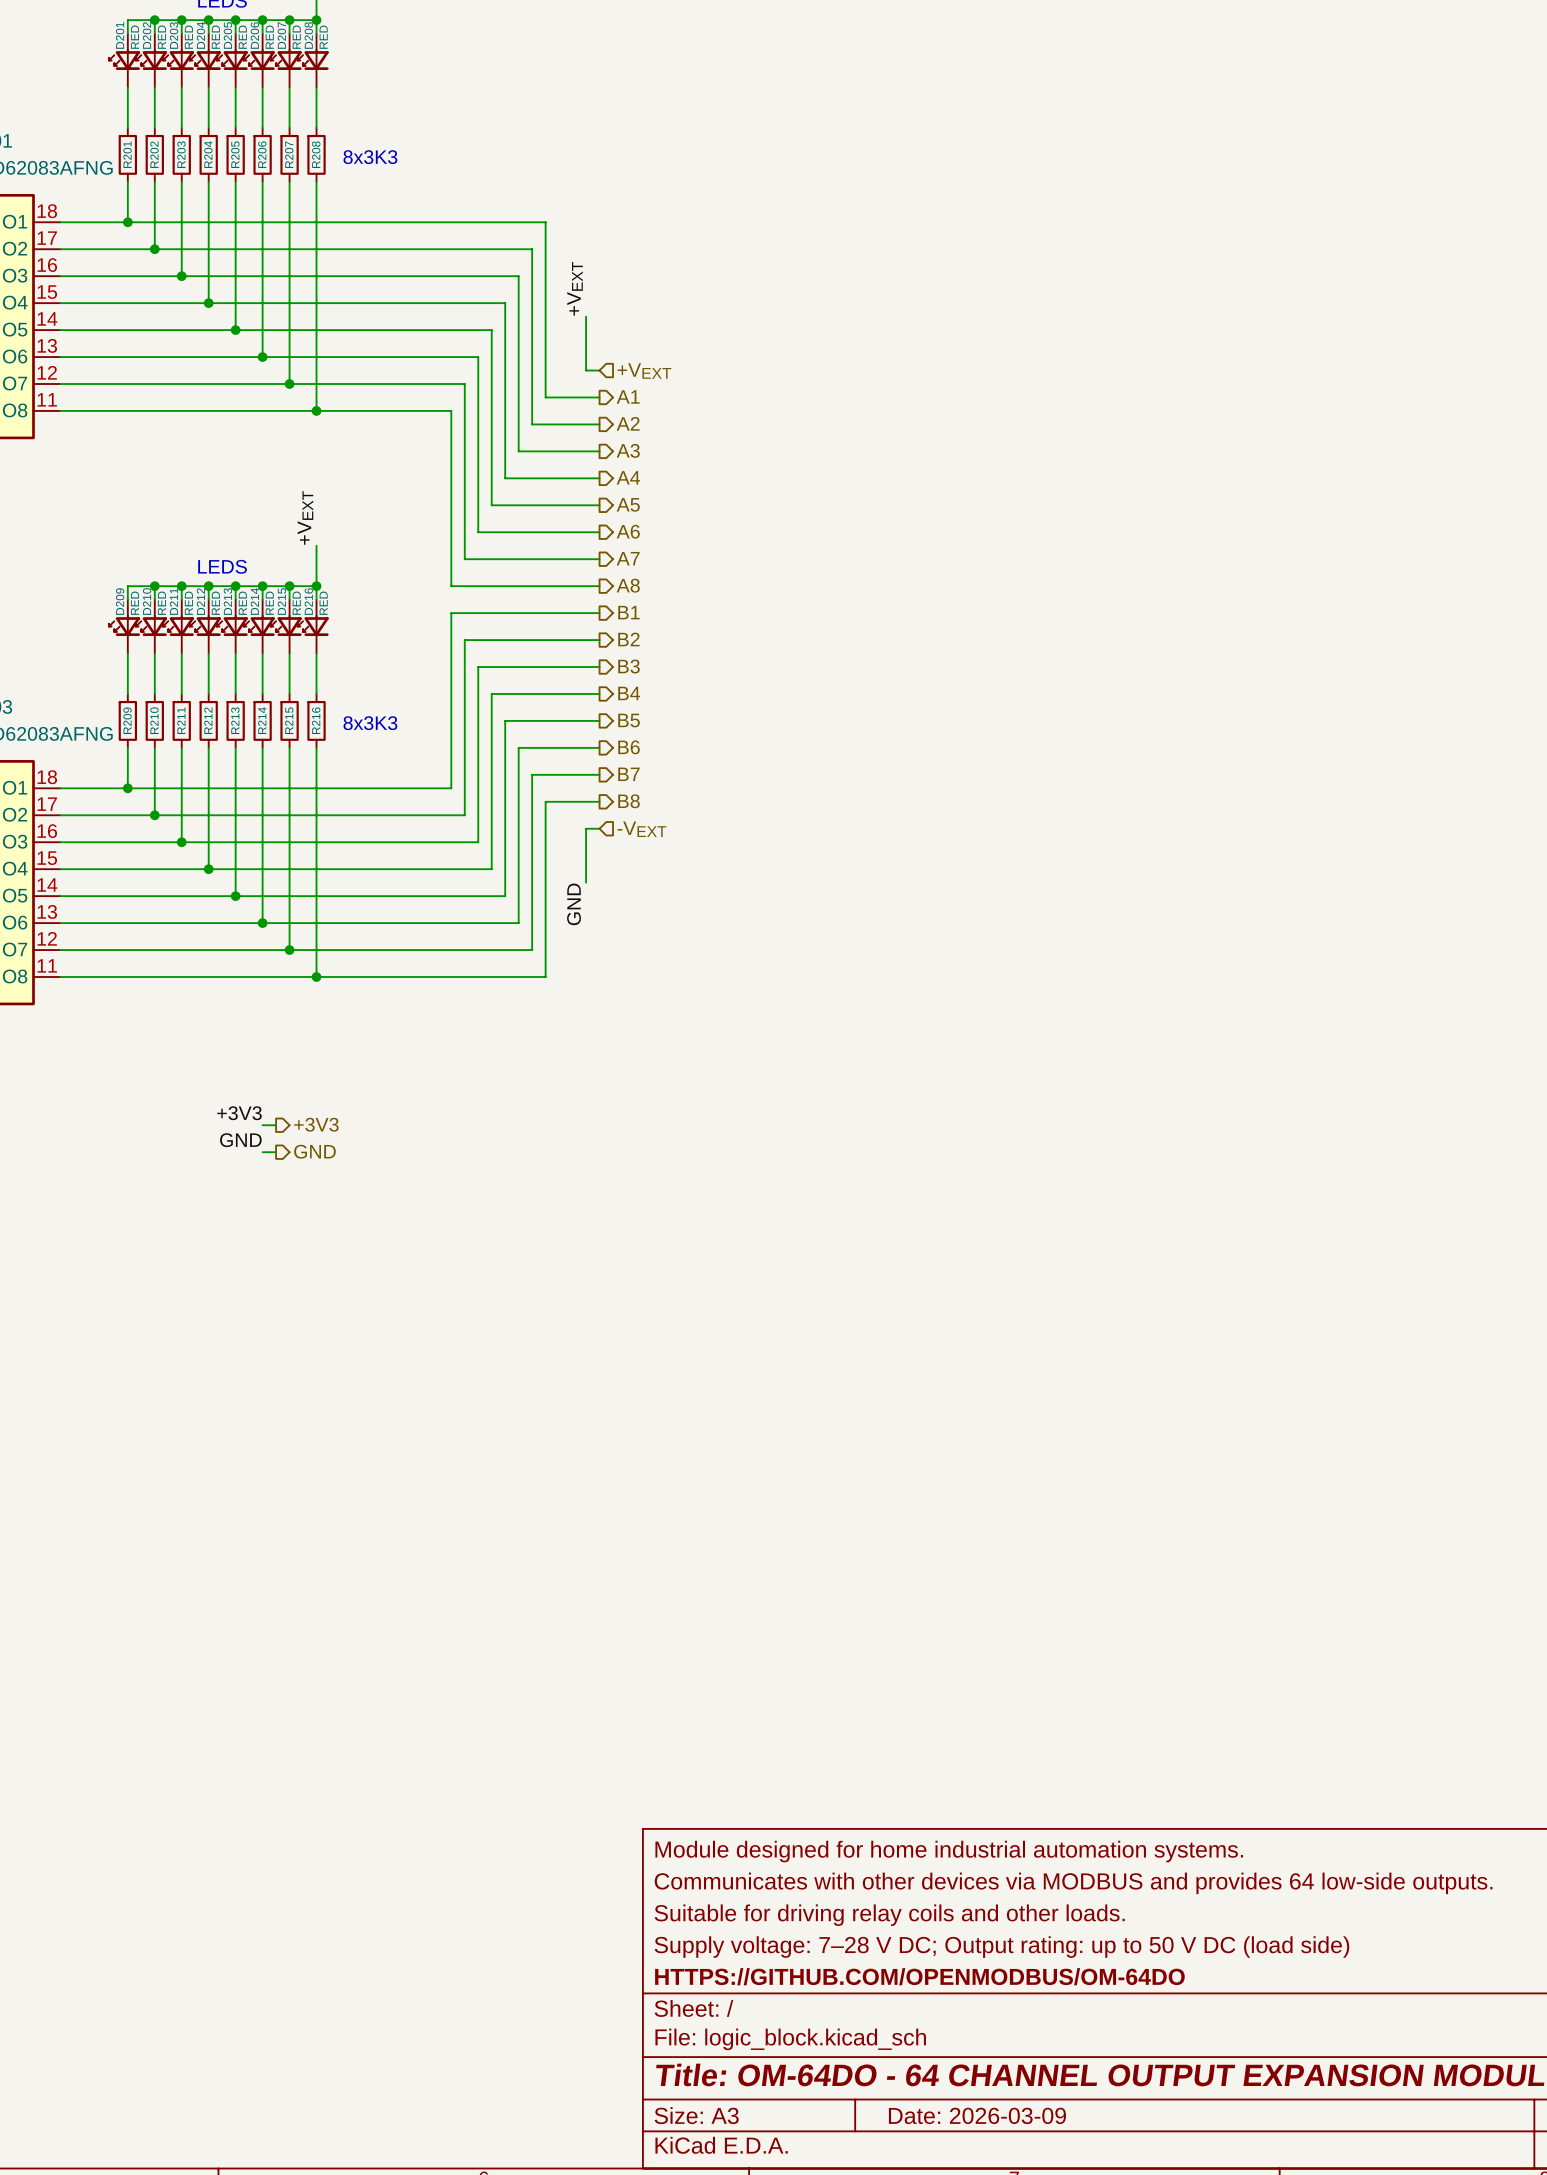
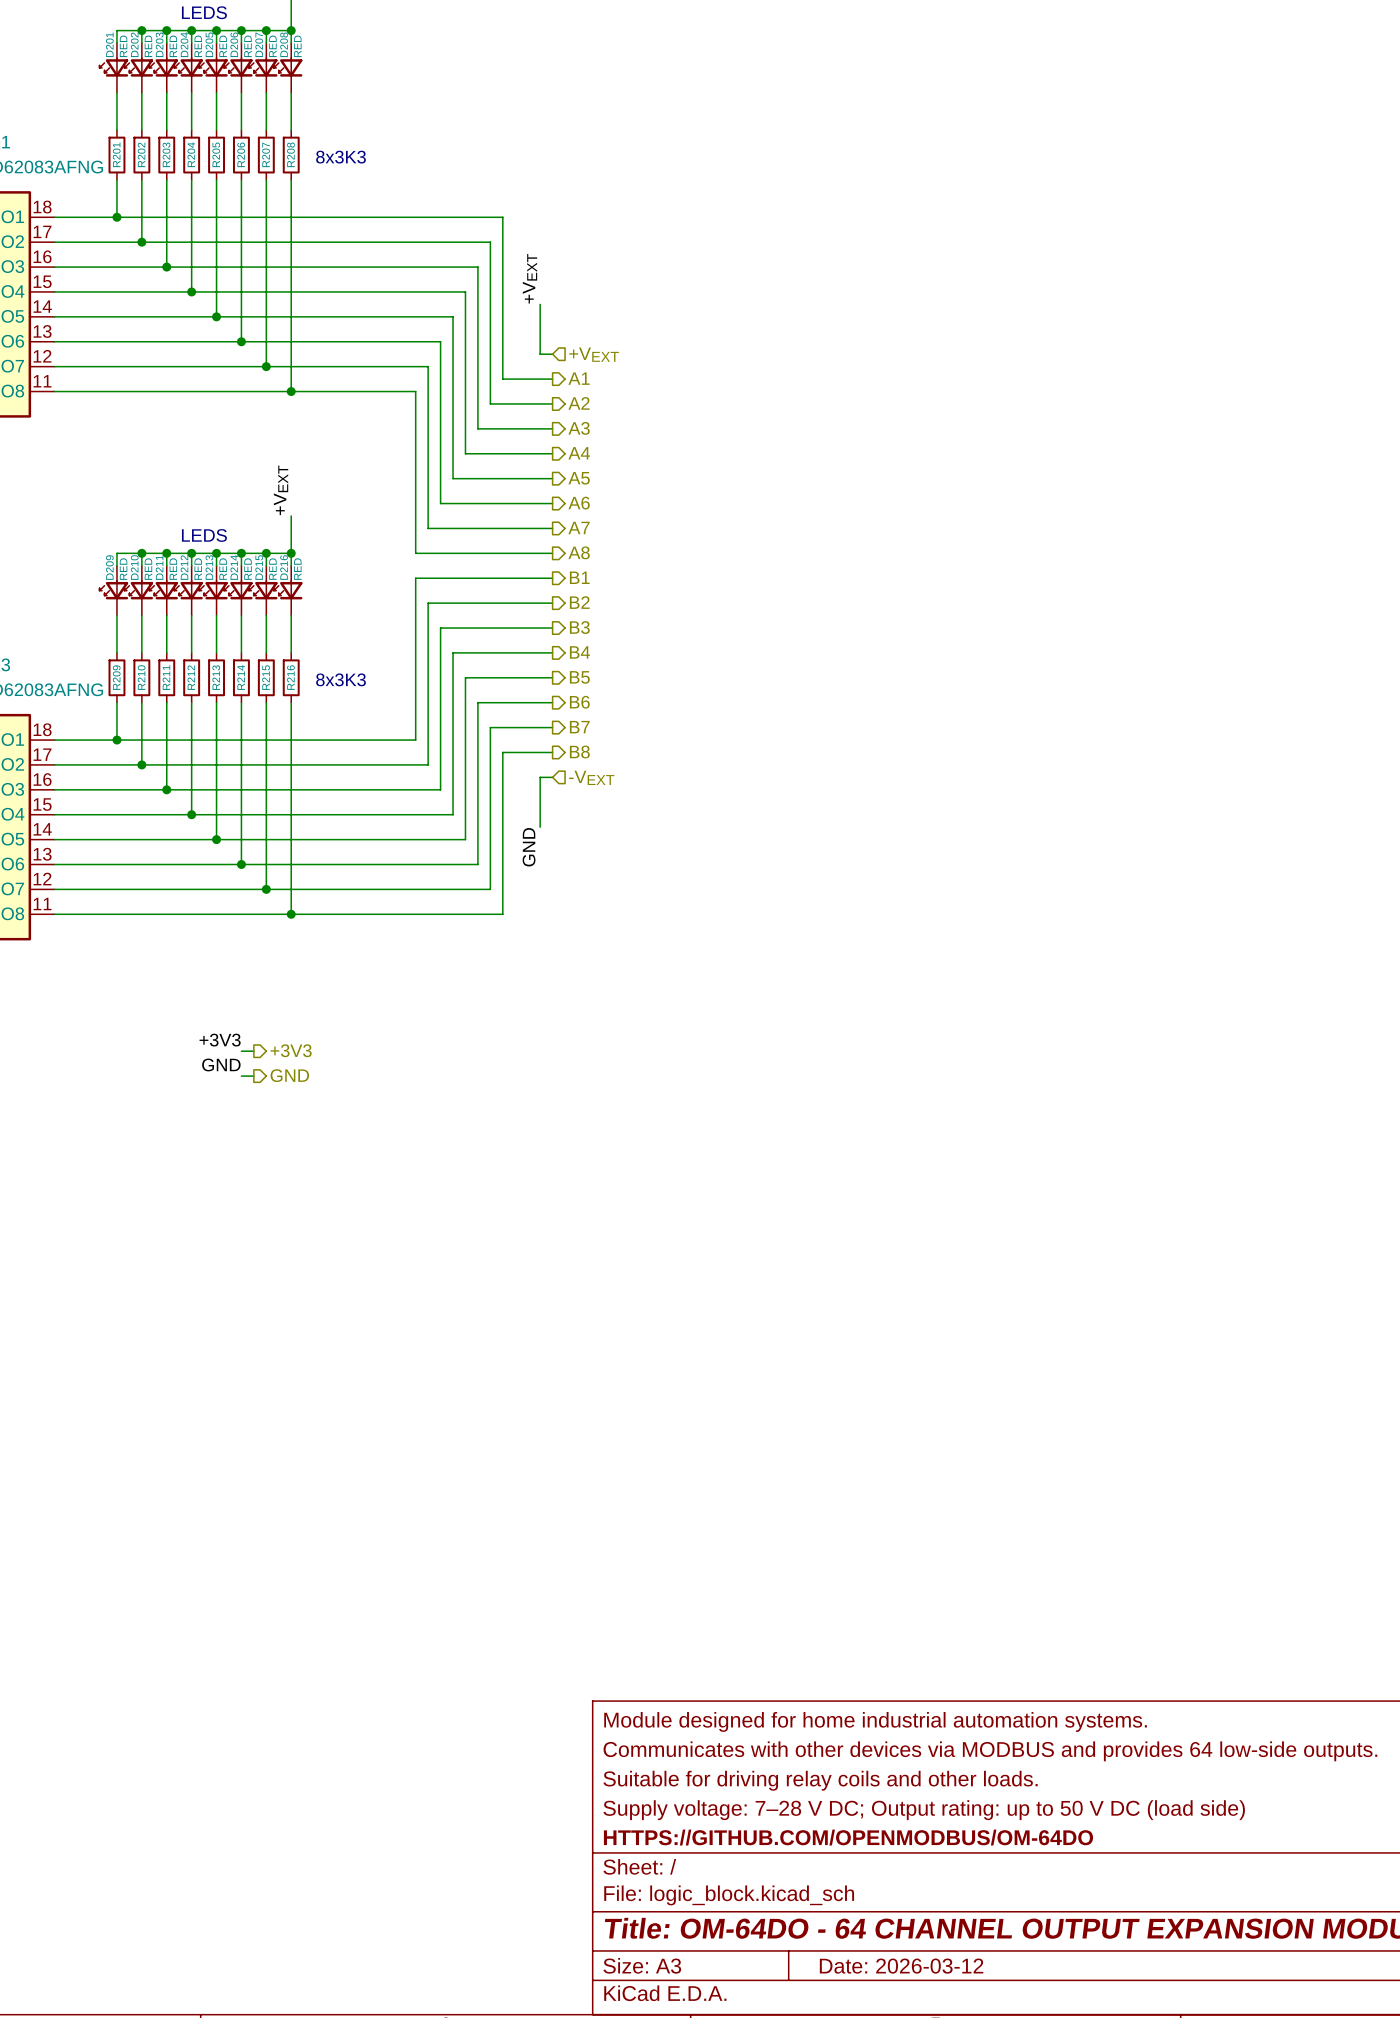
title block: Date: 2026-03-09 (977, 2115) -> Date: 2026-03-12 (901, 1966)

